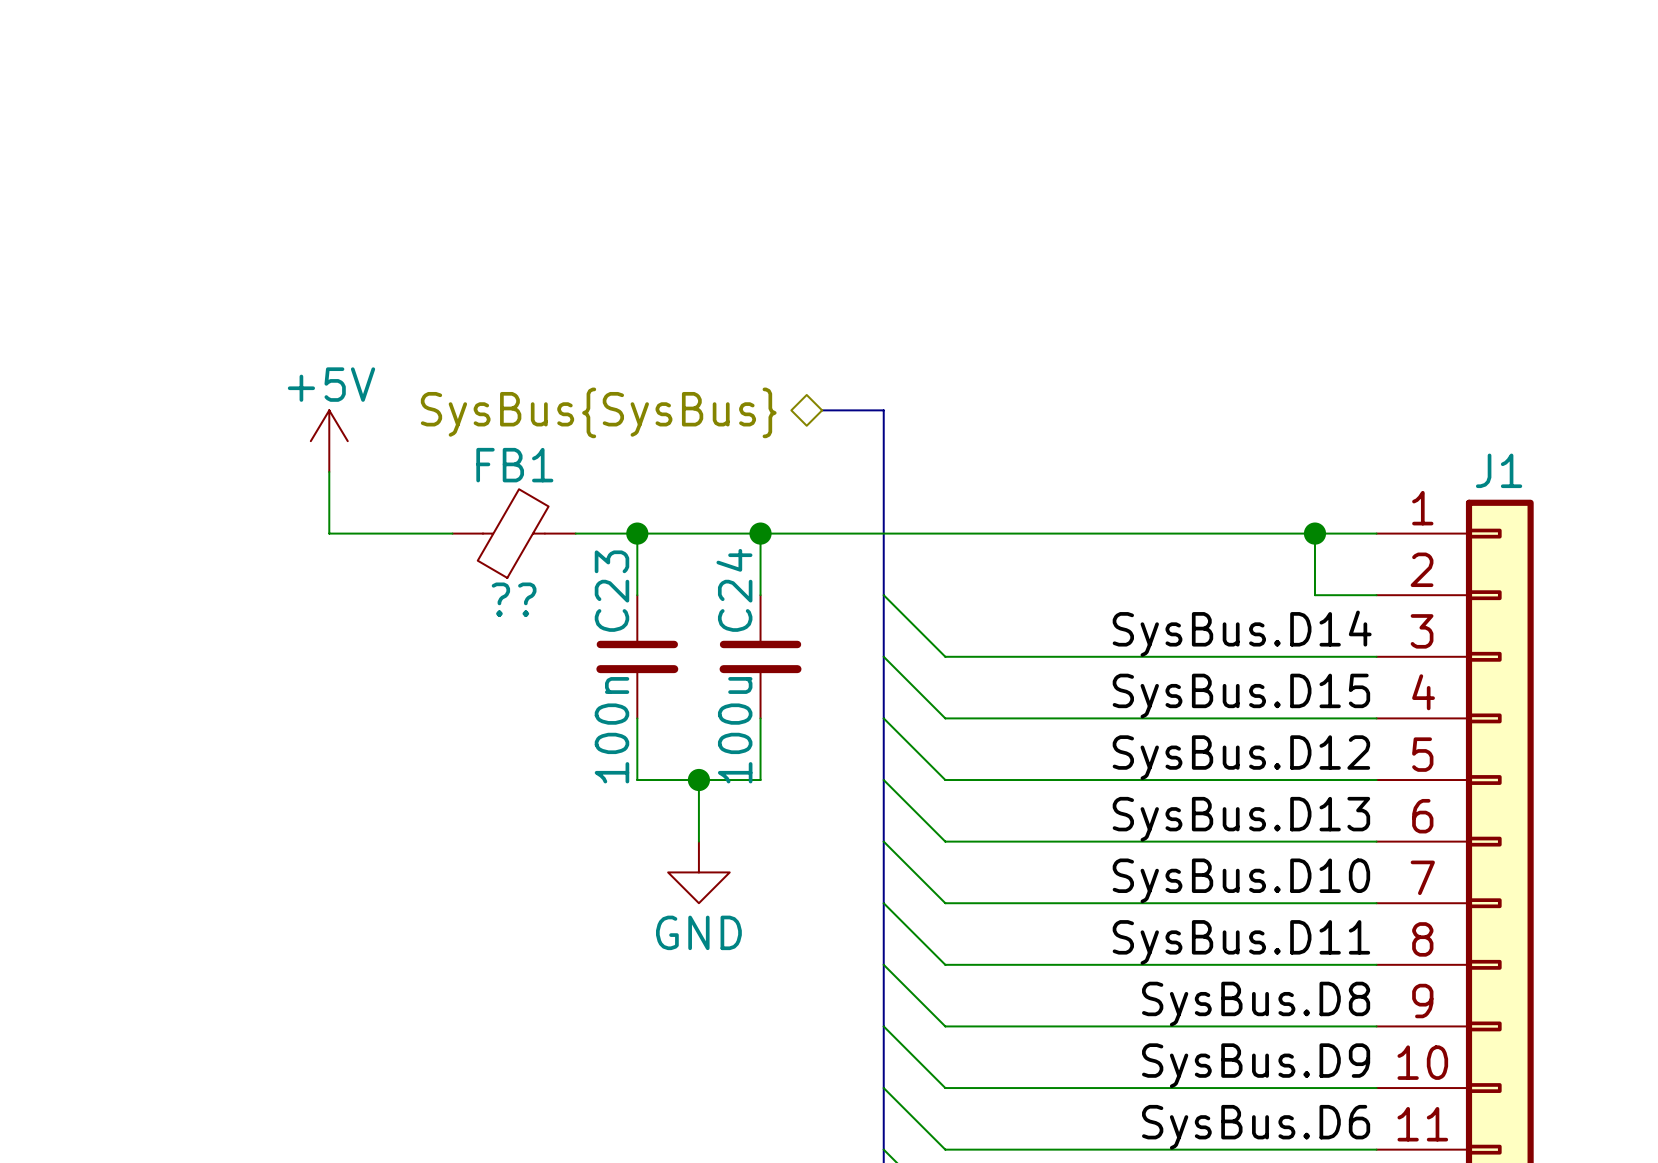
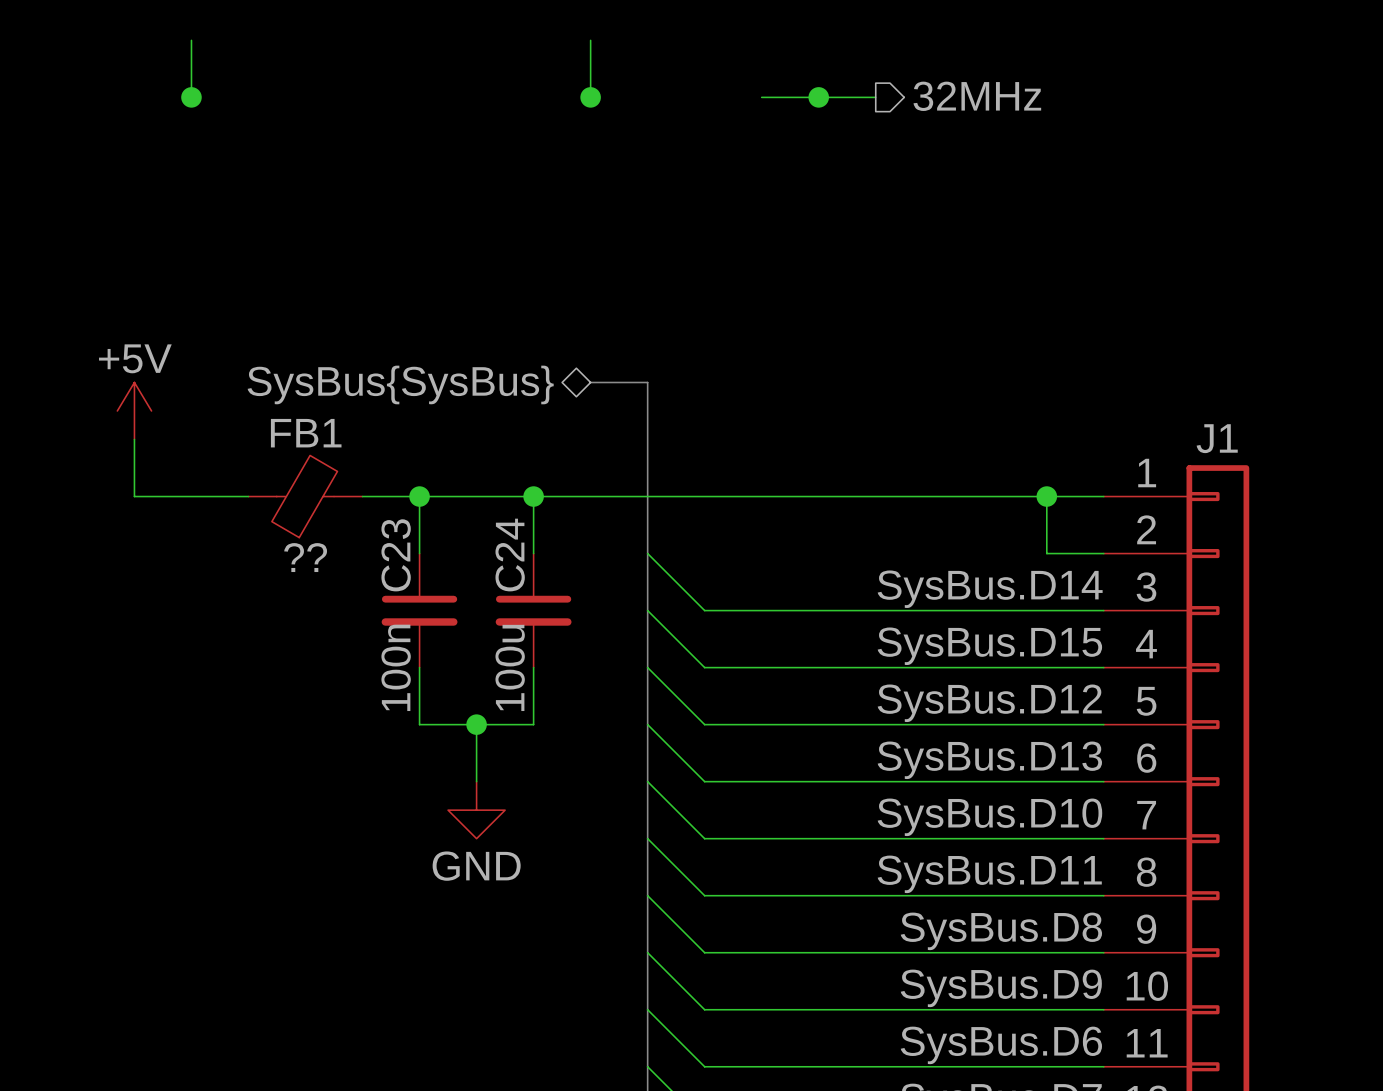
wire: none -> (191, 40) (191, 97)
wire: none -> (590, 40) (590, 97)
hierarchical label: none -> 32MHz (977, 96)
junction: none -> (191, 97)
junction: none -> (590, 97)
wire: none -> (761, 97) (875, 97)
junction: none -> (818, 97)

